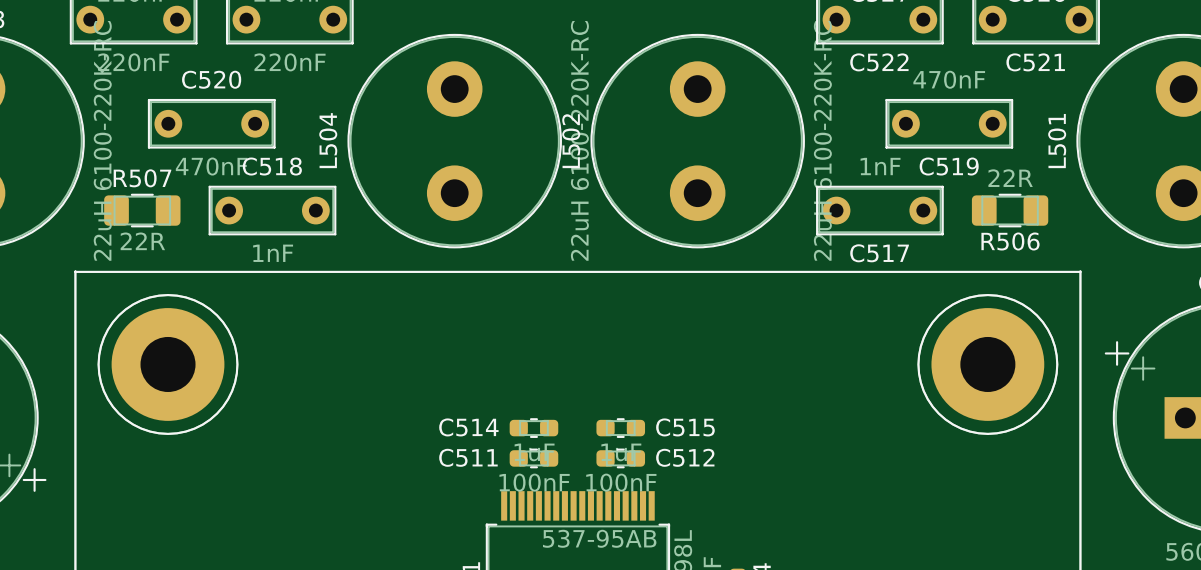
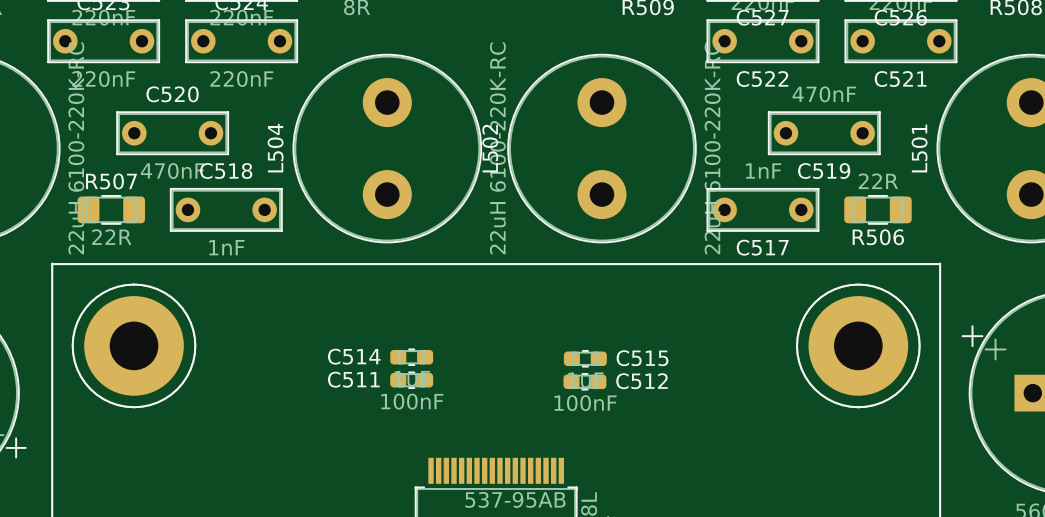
C514 position: (533, 428) -> (411, 357)
C515 position: (620, 428) -> (585, 358)
C511 position: (533, 458) -> (411, 380)
C512 position: (620, 458) -> (584, 381)

